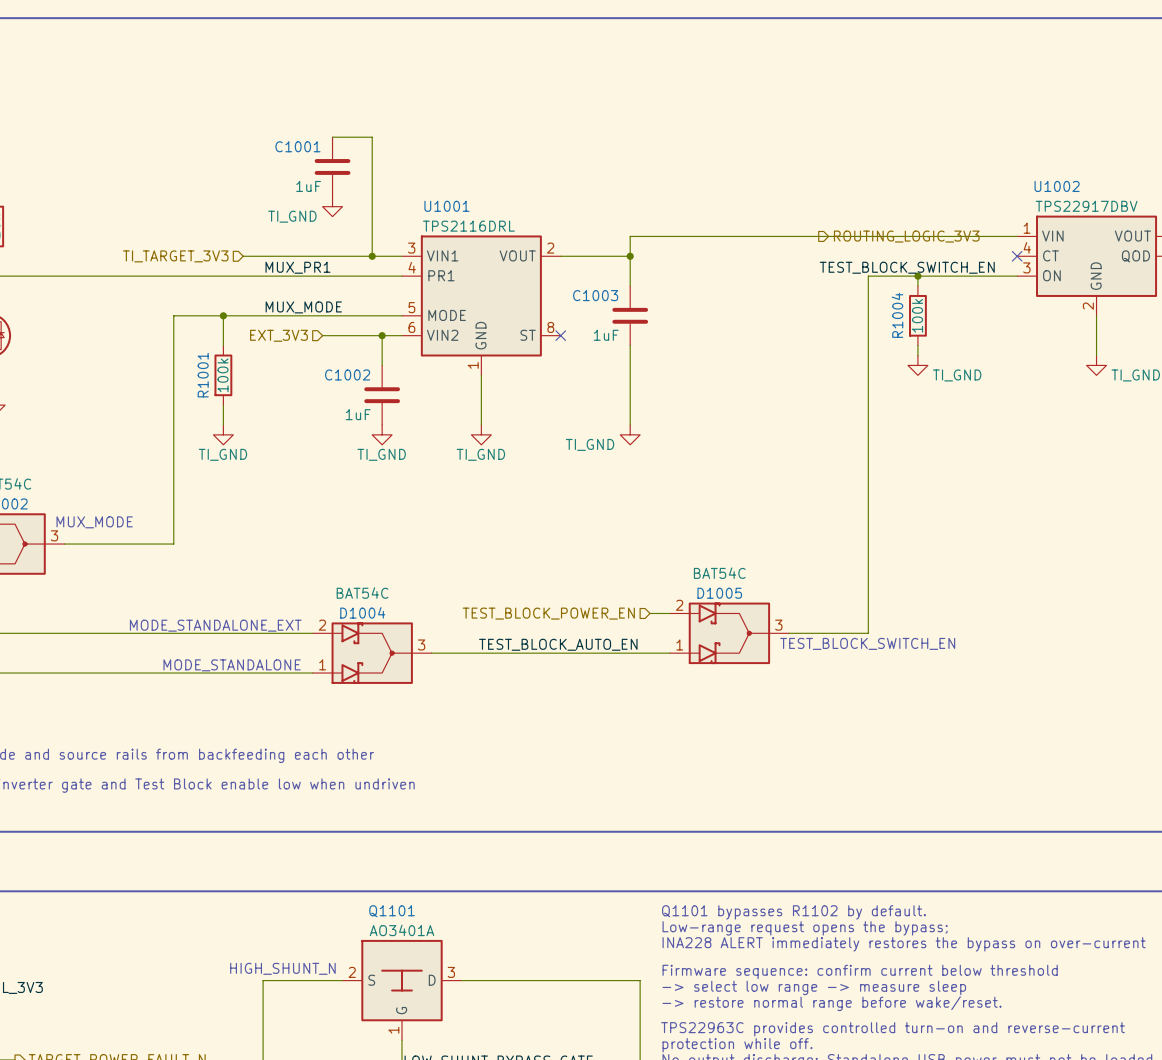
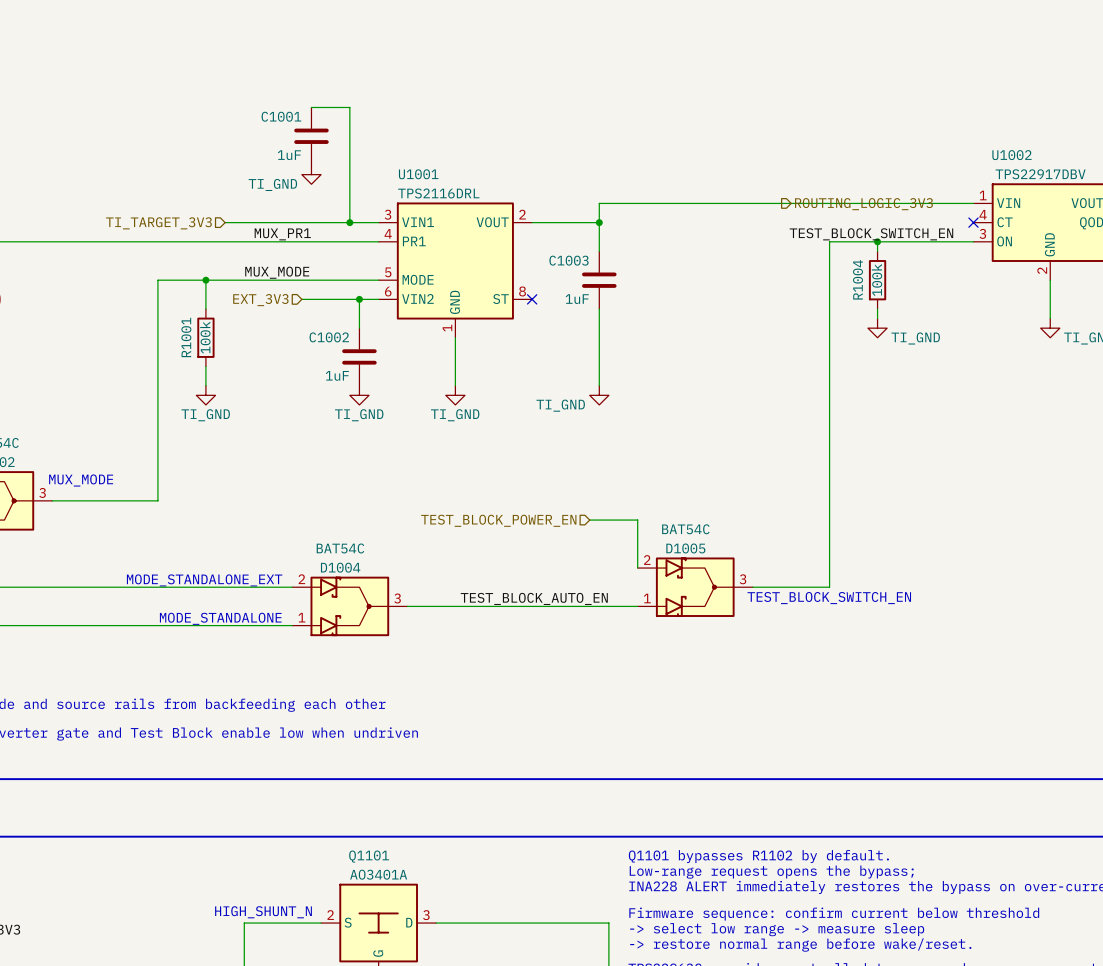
hierarchical label position: TEST_BLOCK_POWER_EN (548, 613) -> TEST_BLOCK_POWER_EN (498, 520)
wire: (650, 613) (669, 613) -> (589, 520) (637, 520) (637, 568)

